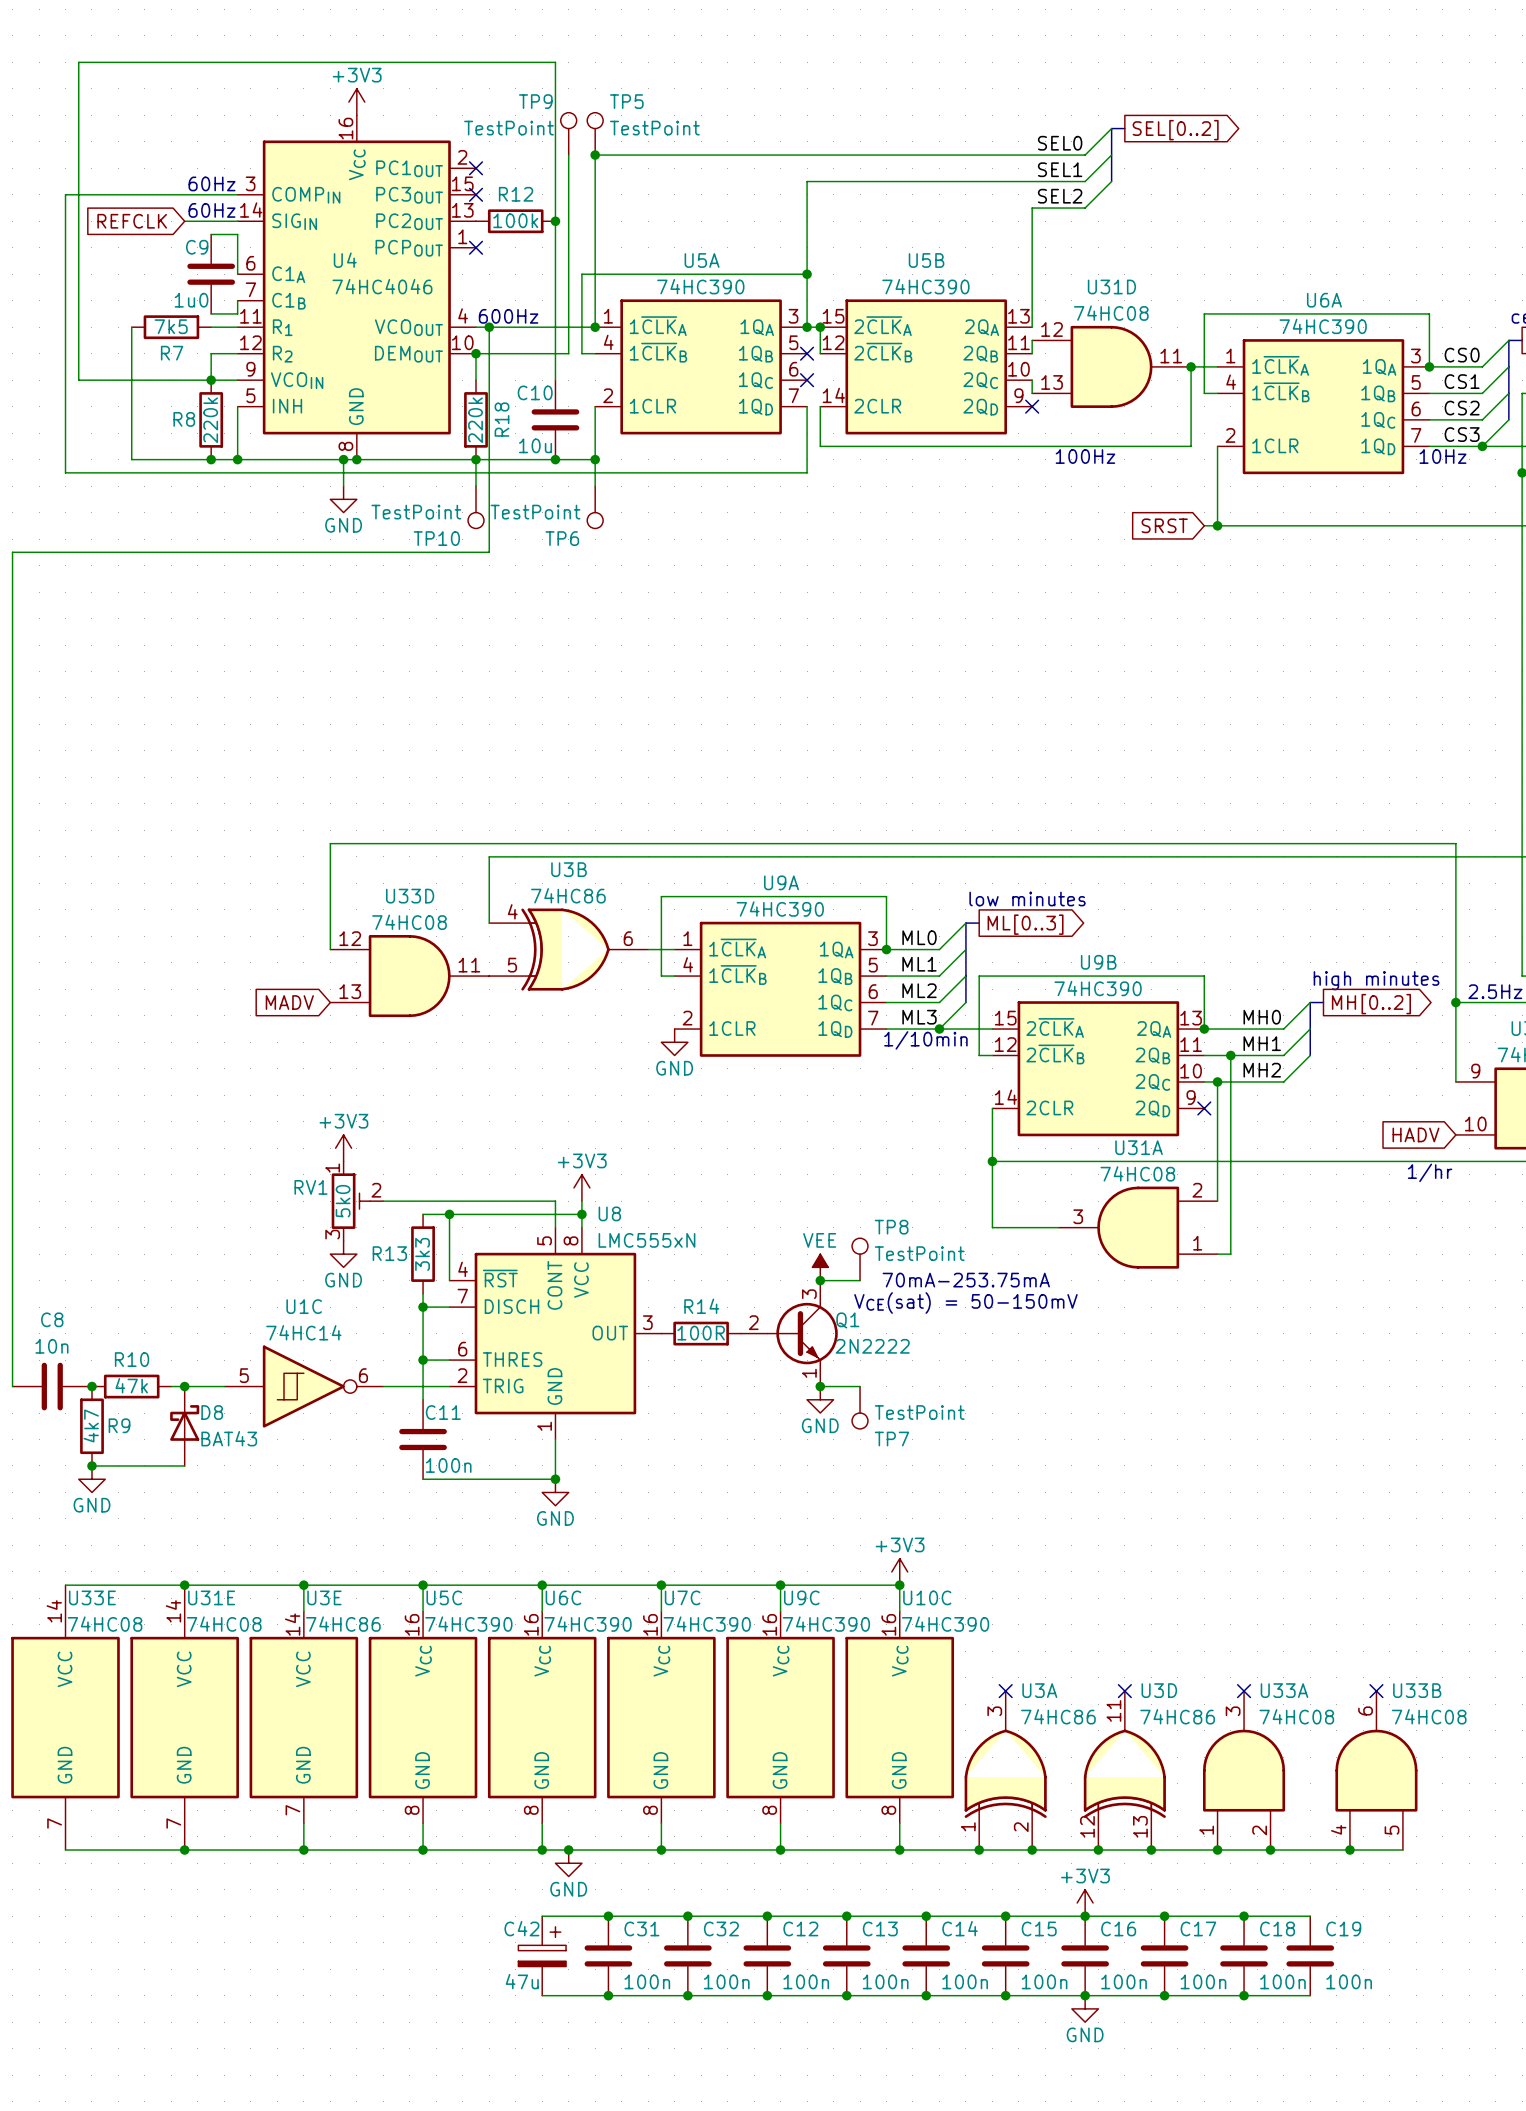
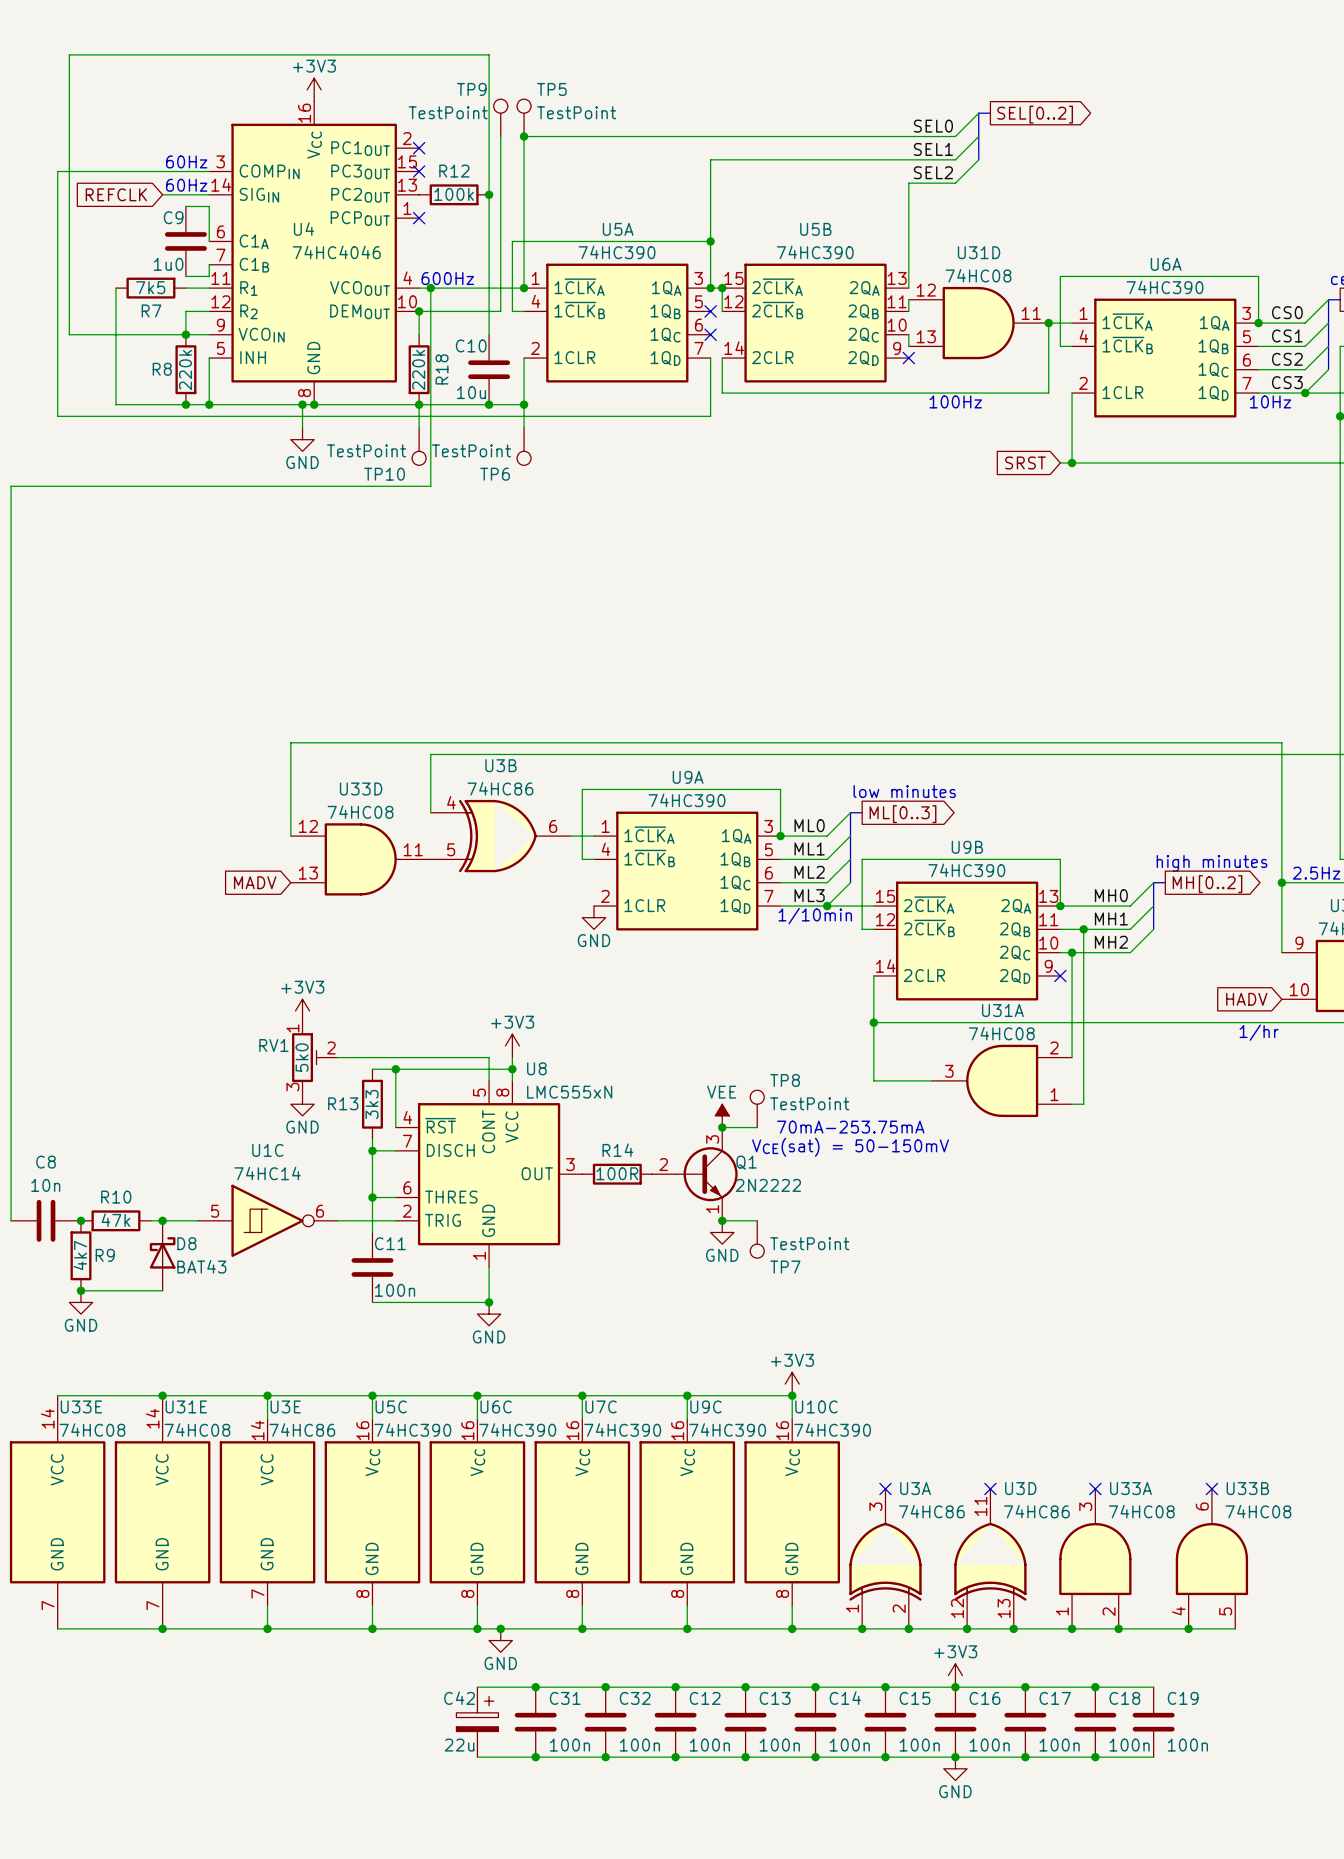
C42 value: 47u (522, 1981) -> 22u (459, 1745)

